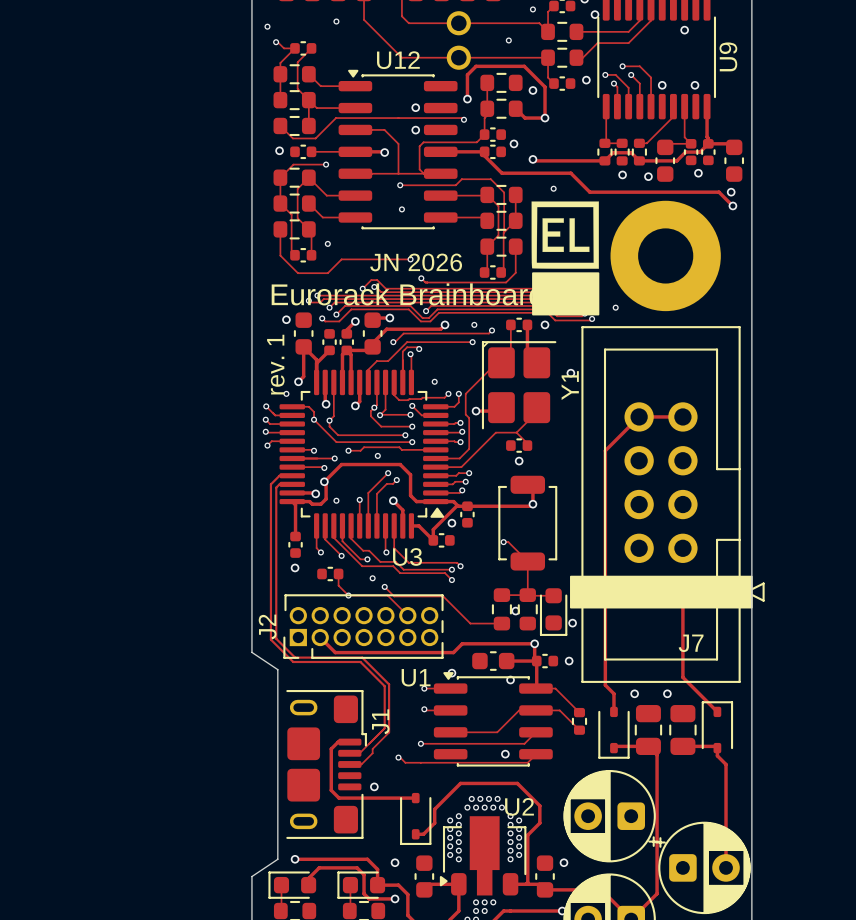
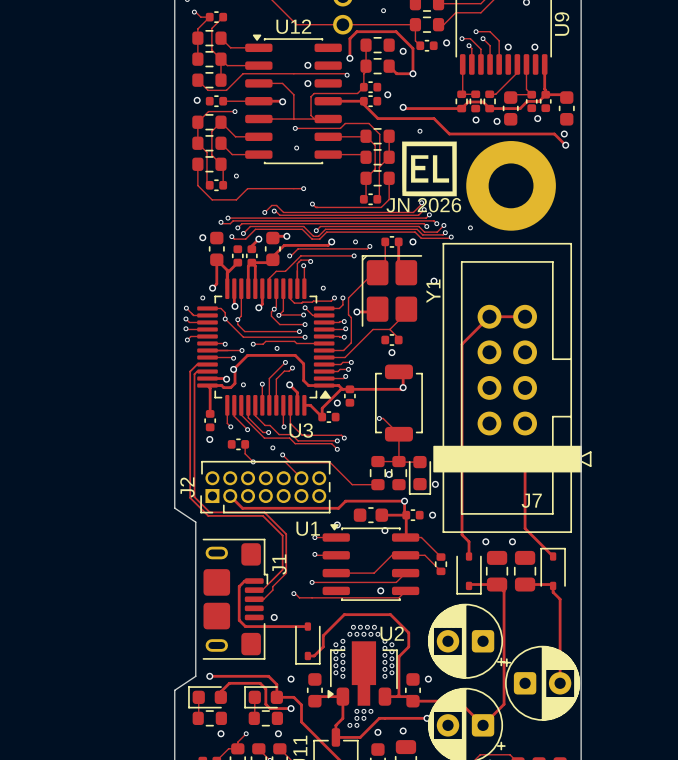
text position: JN 2026 (416, 262) -> JN 2026 (423, 205)
drawing: [532, 272, 600, 316] -> none
text: Eurorack Brainboard (407, 294) -> none
text: rev. 1 (275, 364) -> none

